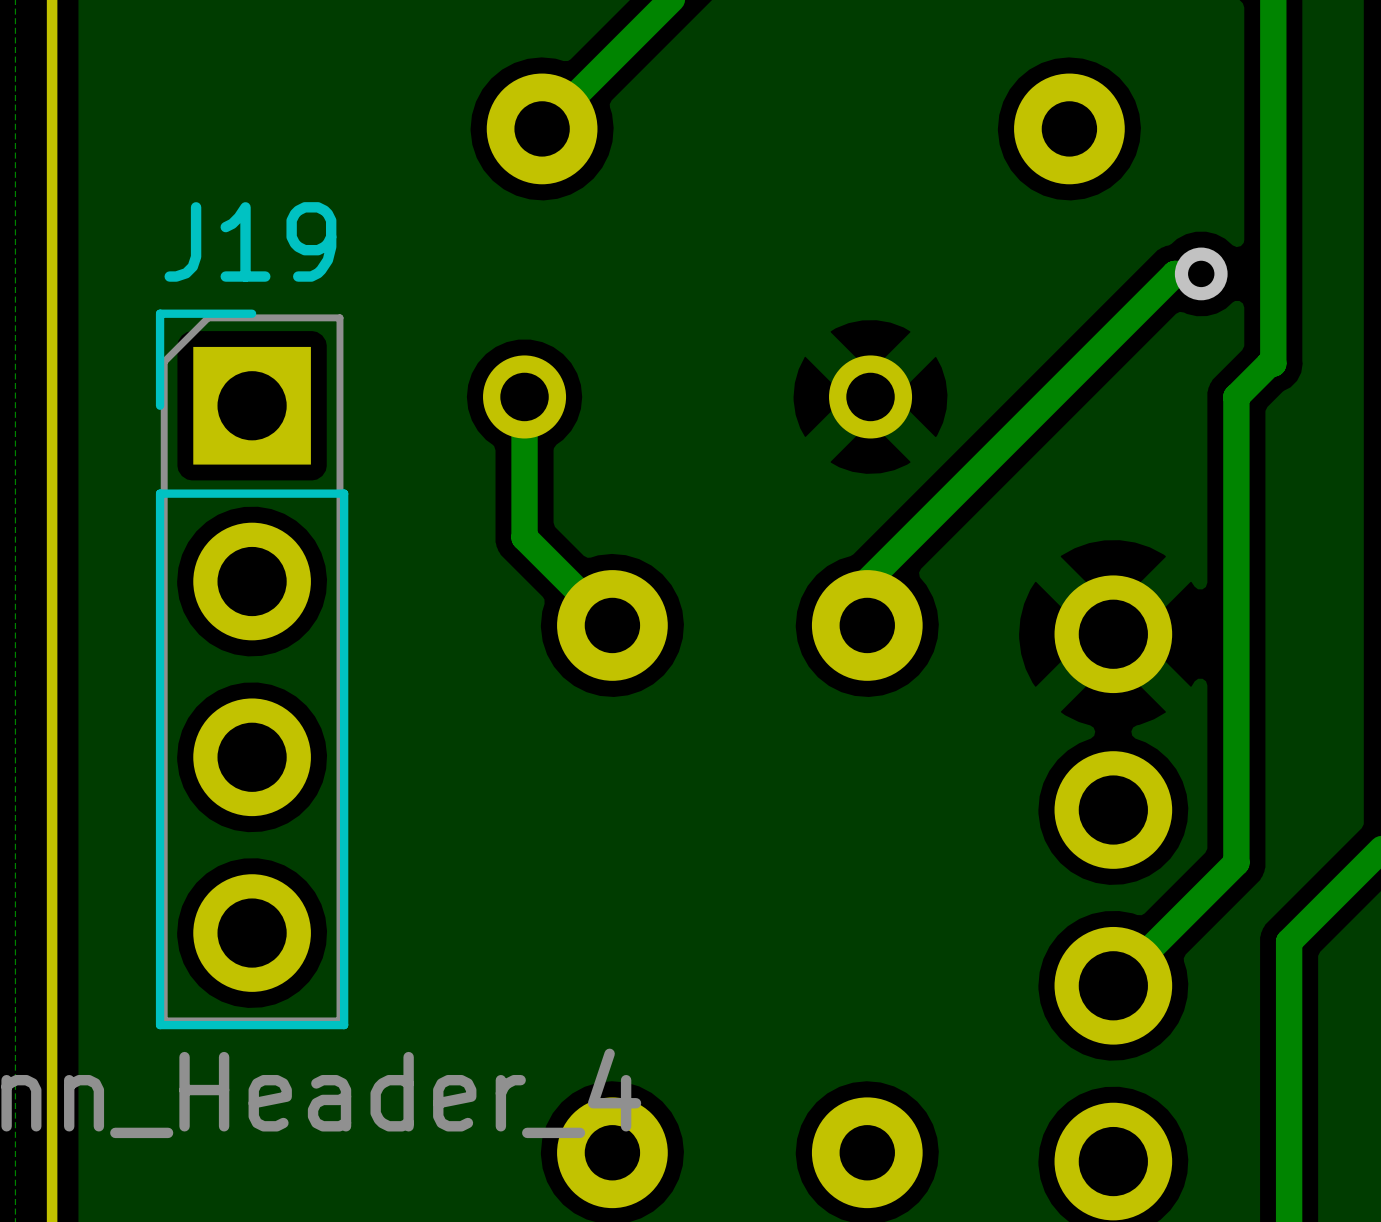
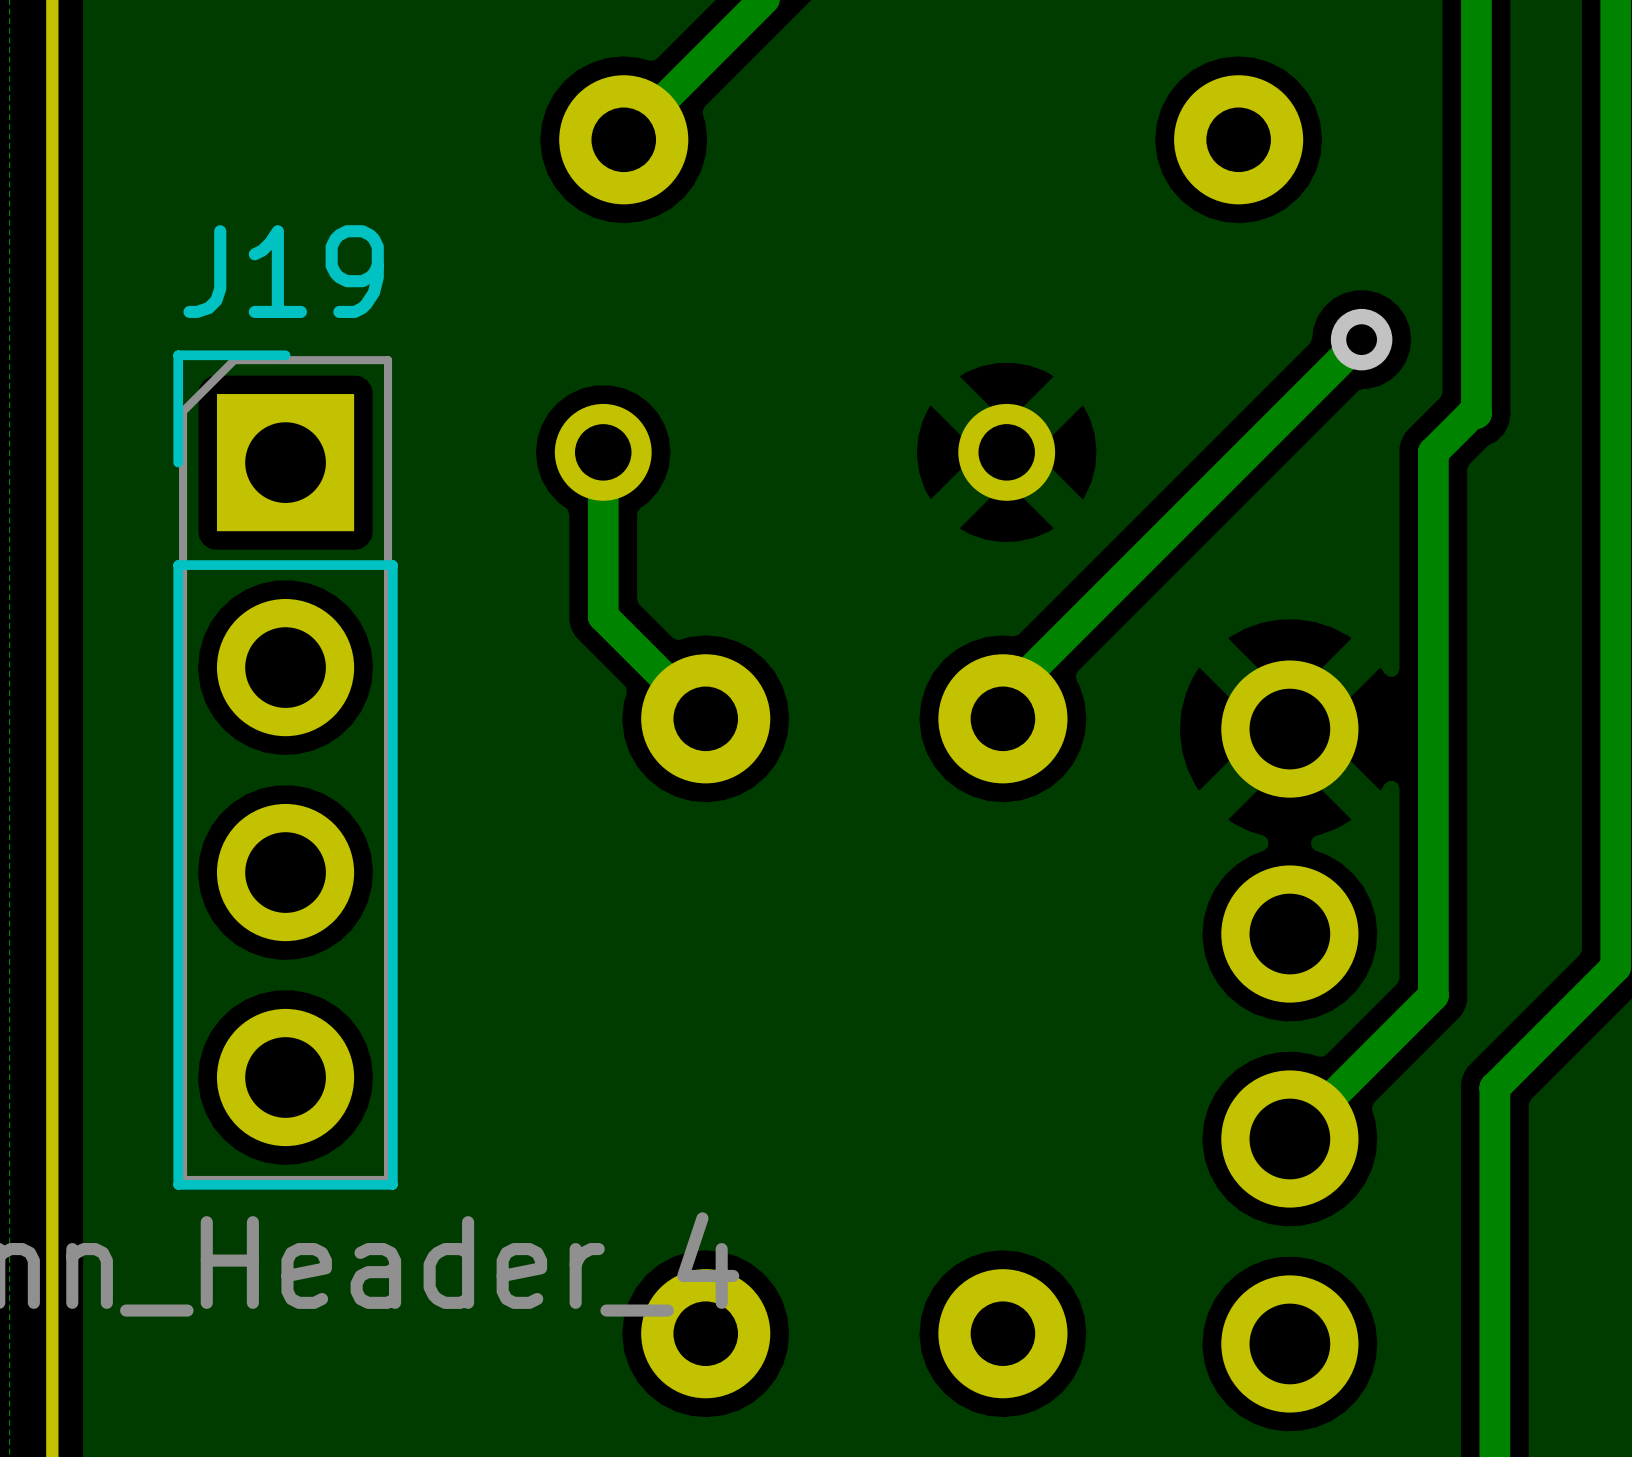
track: (1201, 273) (1174, 273) (867, 581) (867, 607) -> (1361, 339) (1002, 698)
via position: (1201, 273) -> (1361, 339)

